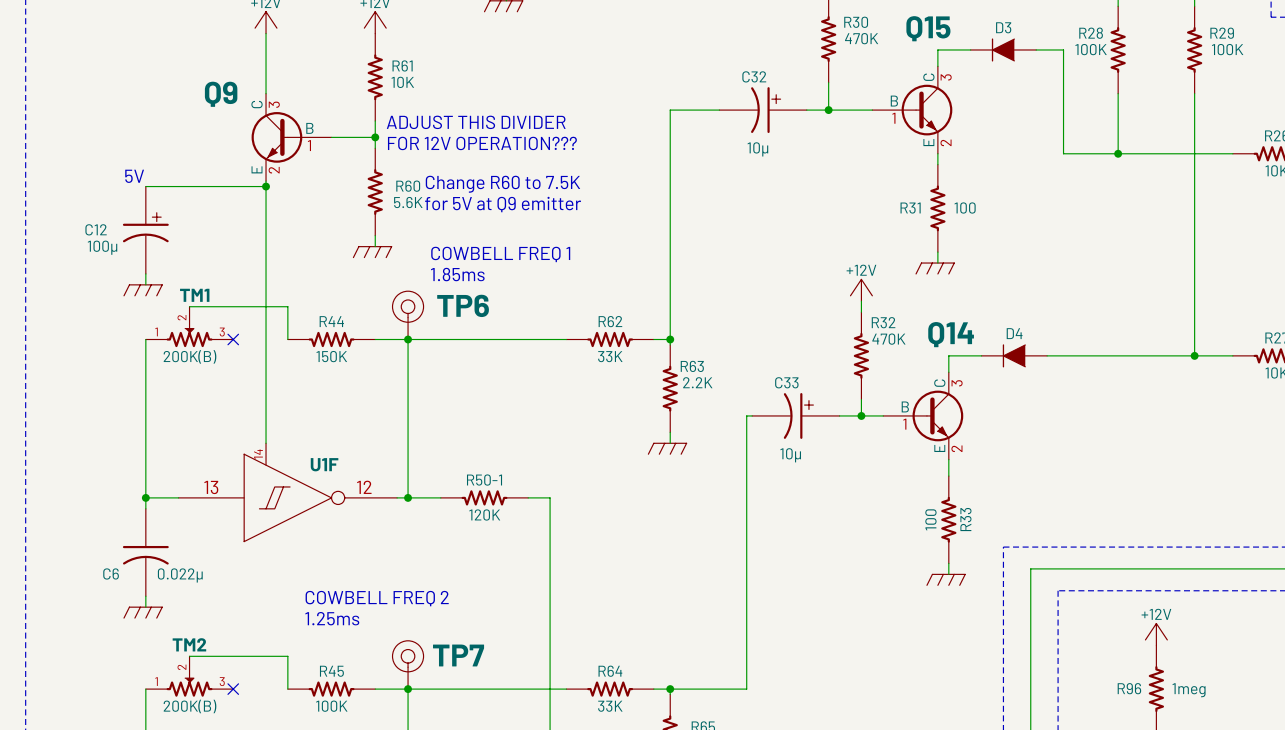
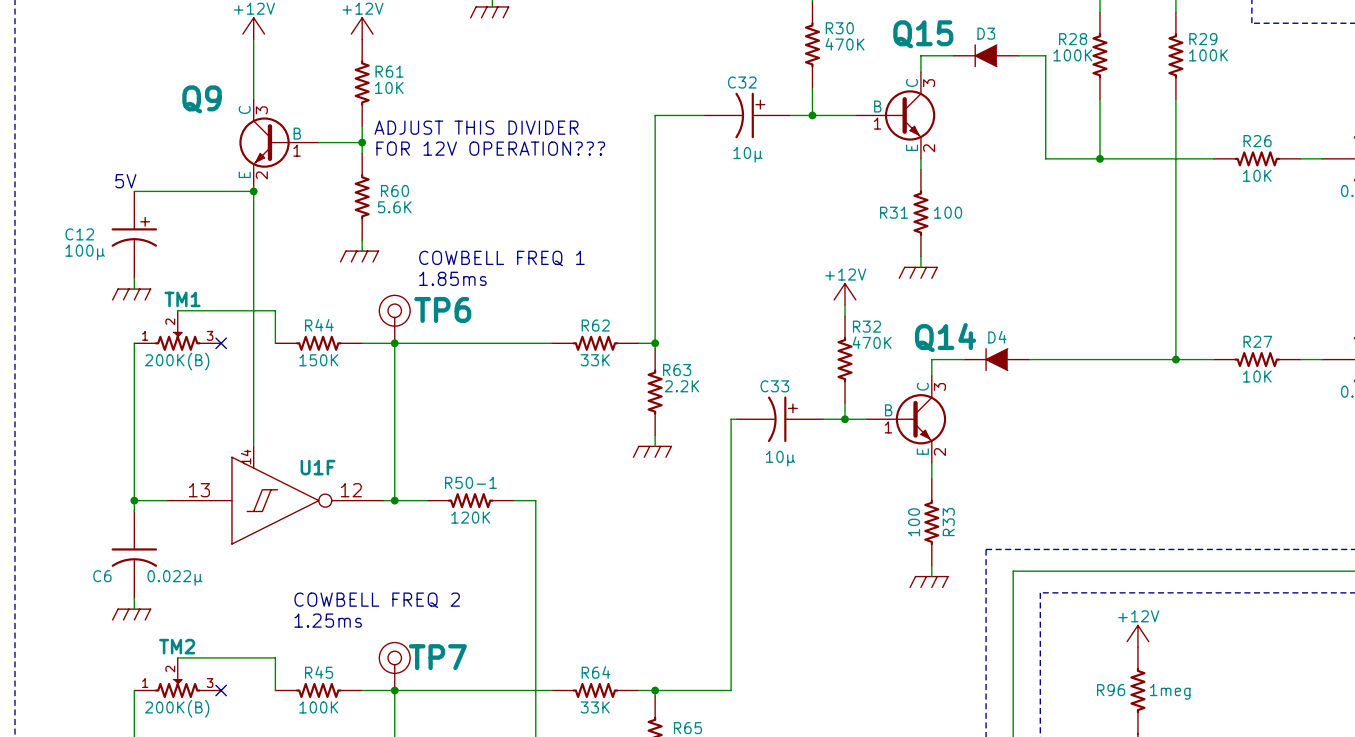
text: Change R60 to 7.5K (502, 184) -> none
text: for 5V at Q9 emitter (503, 204) -> none

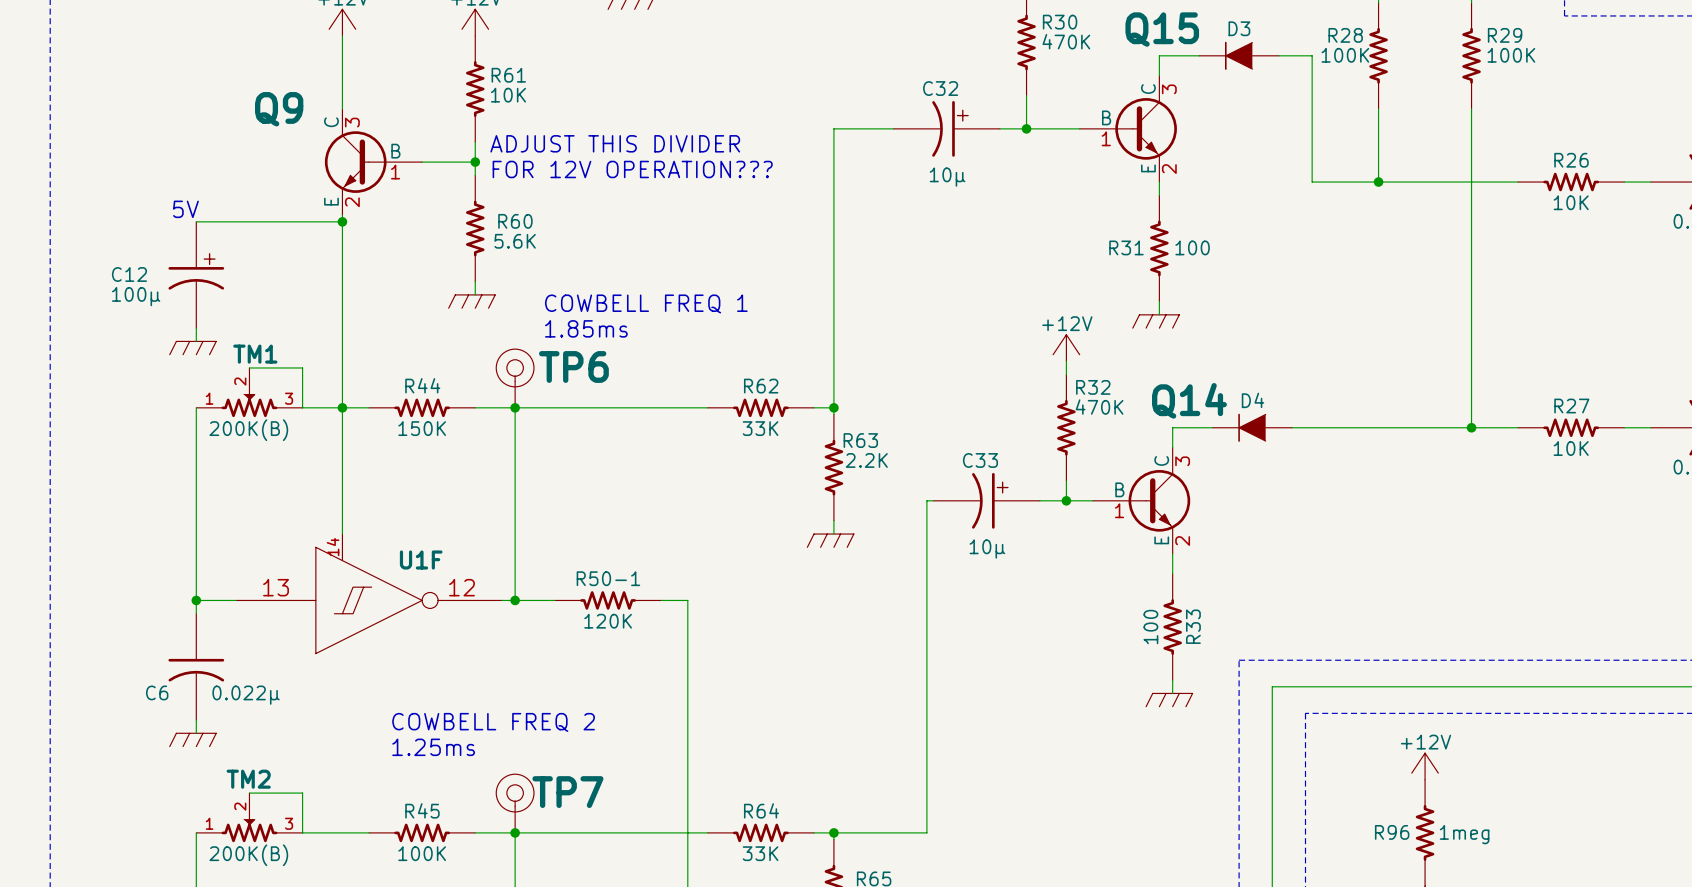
wire: (221, 310) (275, 310) (275, 343) -> (302, 367) (302, 407) (369, 407)
no-connect mark: (221, 343) -> none
junction: none -> (342, 407)
wire: (221, 657) (275, 657) (275, 690) -> (302, 793) (302, 832) (369, 832)
no-connect mark: (221, 690) -> none

